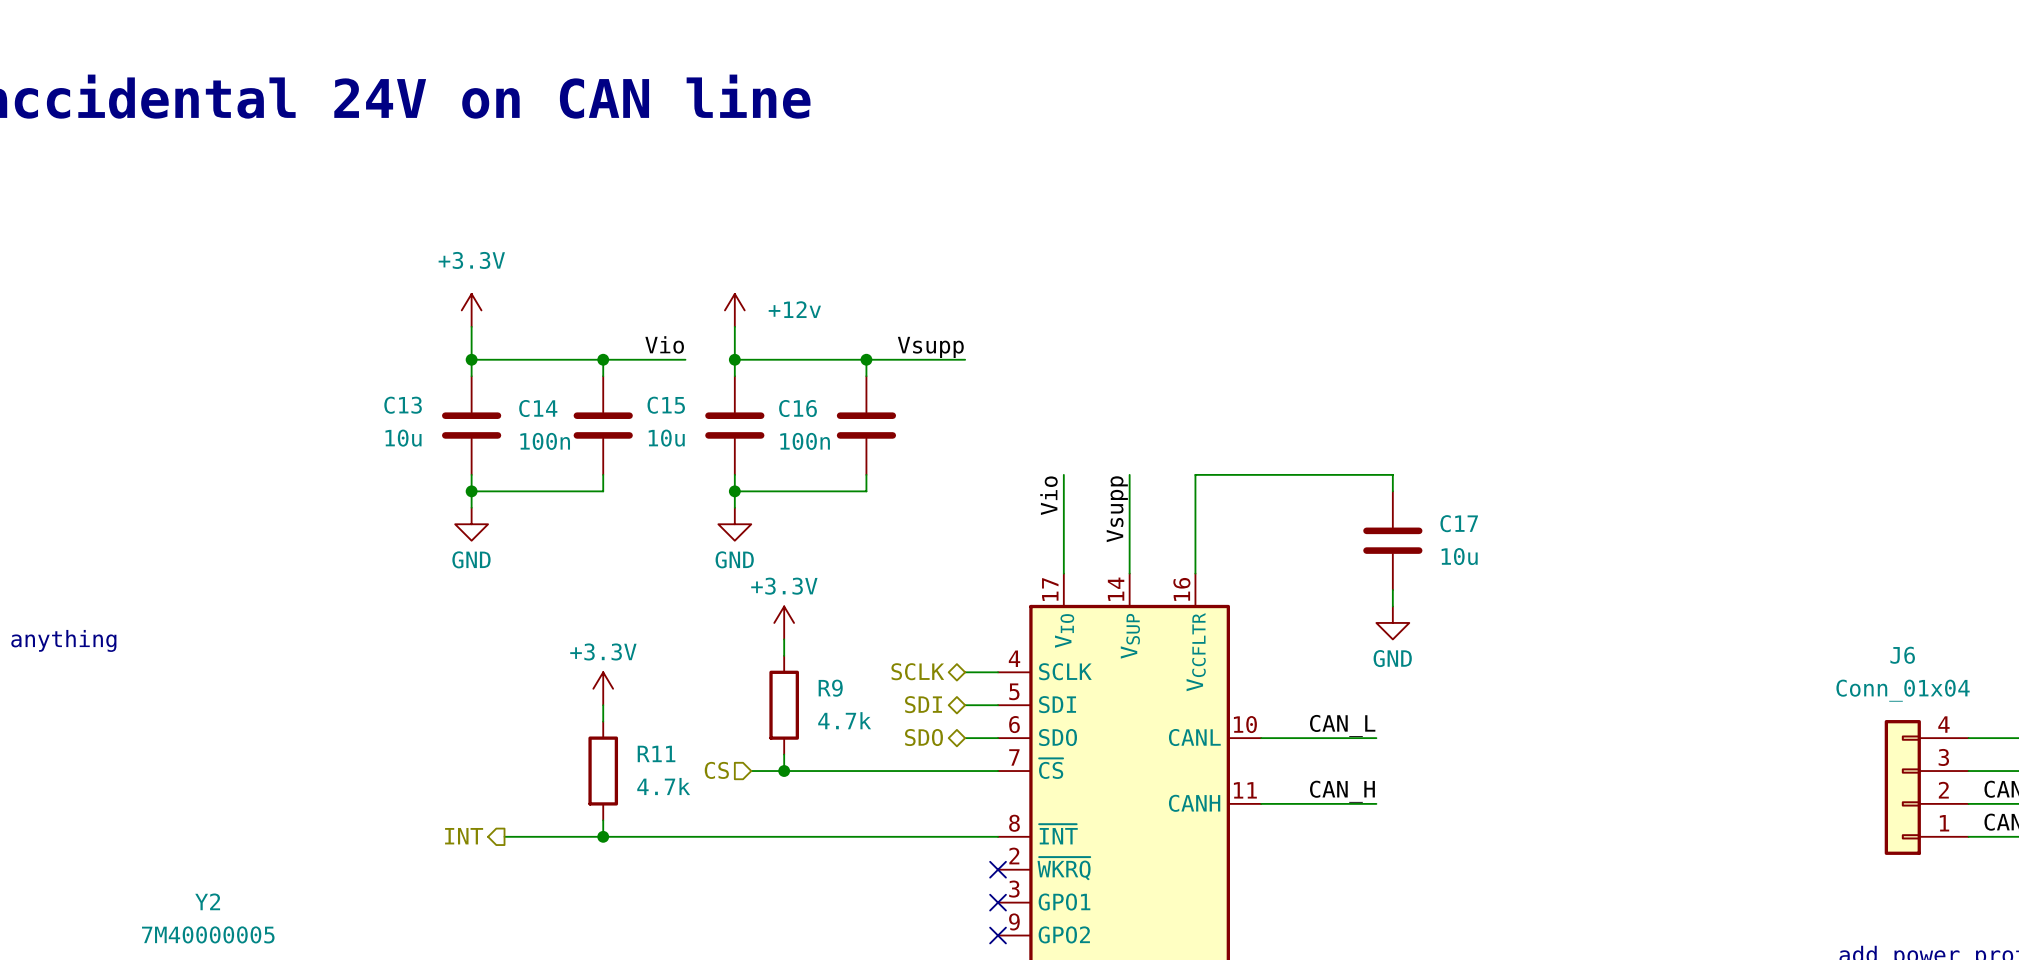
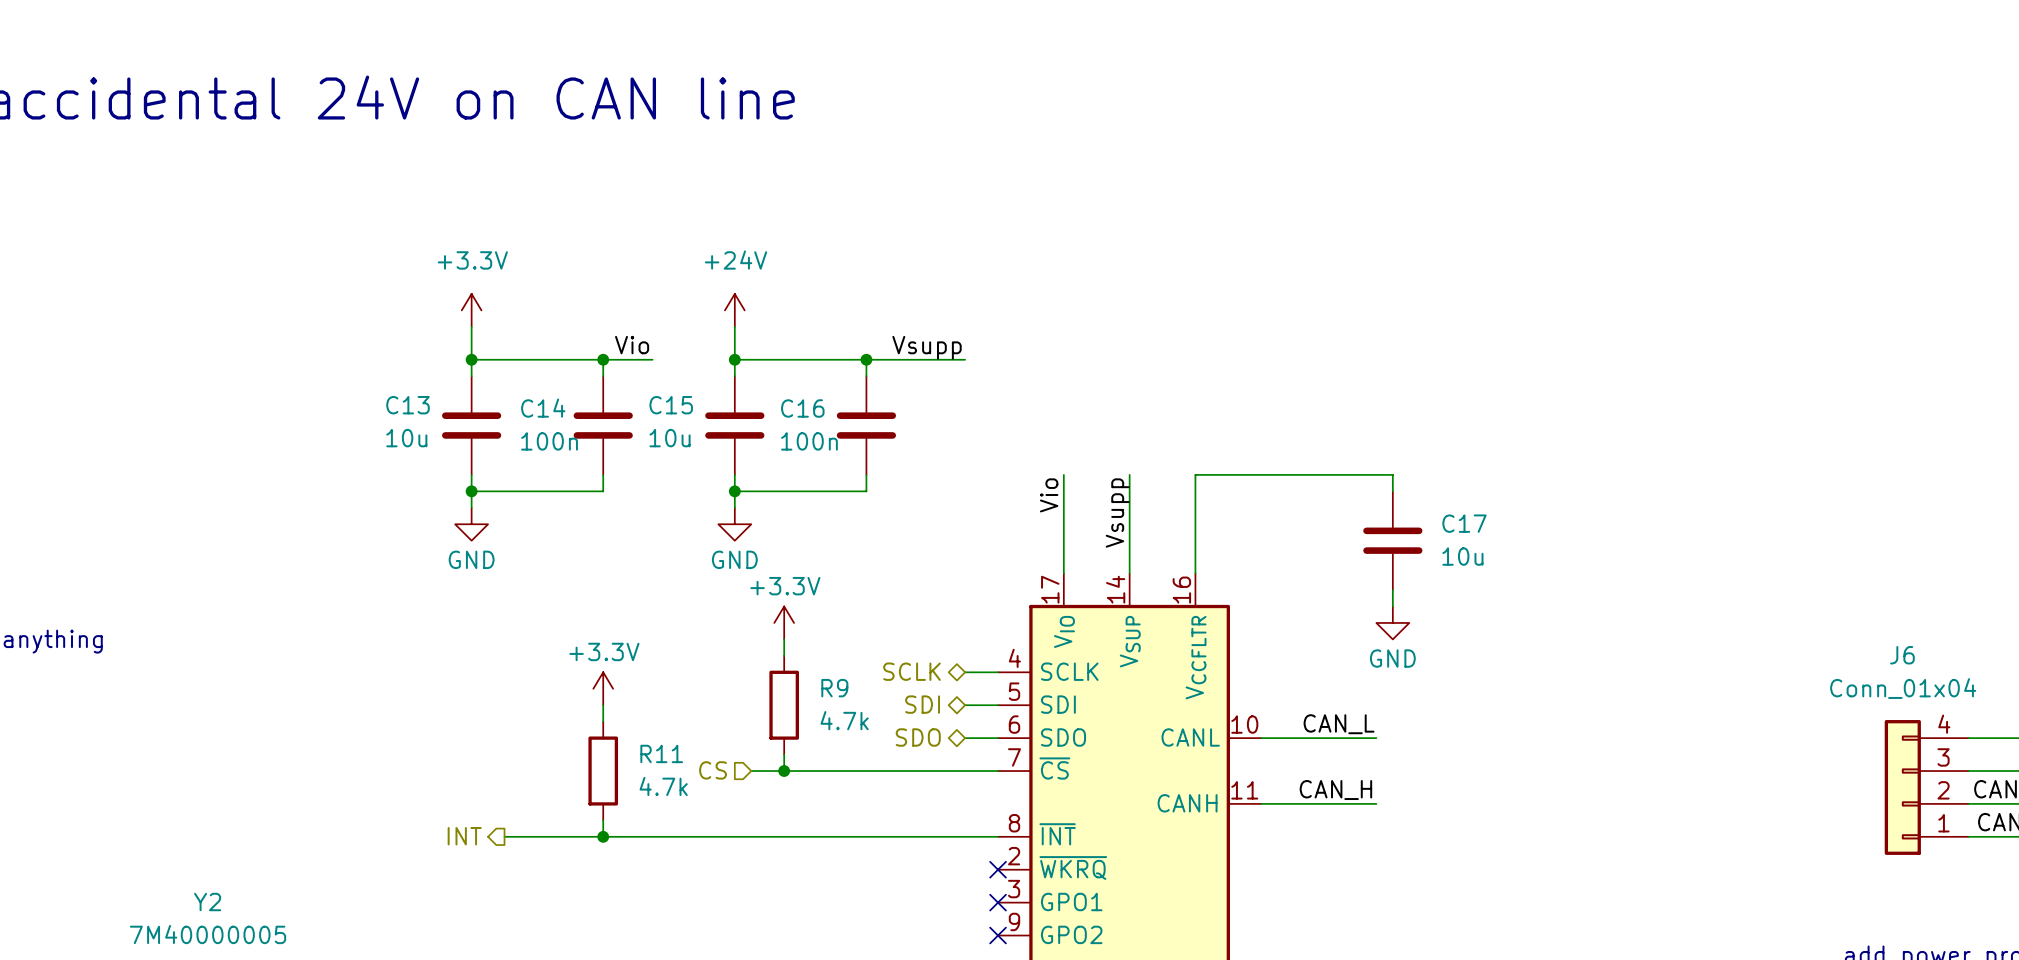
power symbol: +12v (734, 310) -> +24V (734, 310)
label position: Vio (664, 344) -> Vio (632, 345)
wire: (652, 359) (685, 359) -> none

